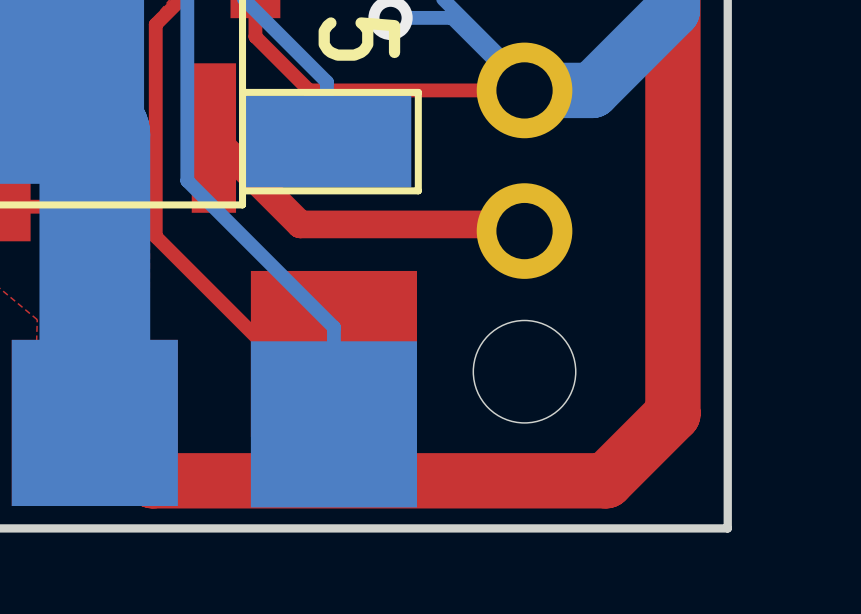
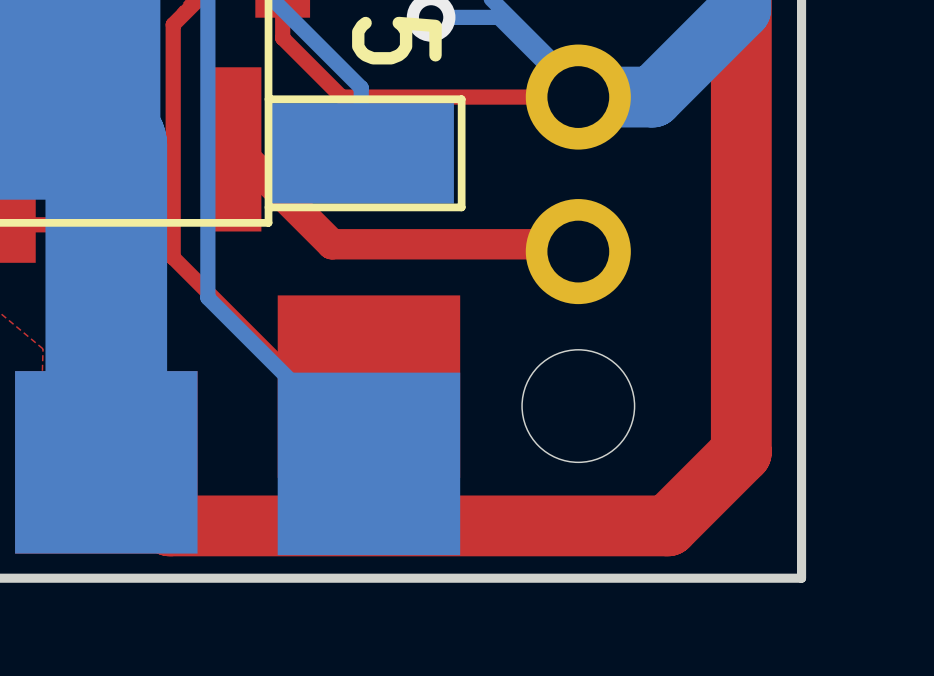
bottom track: (187, 180) (333, 327) (333, 419) -> (207, 196) (207, 297) (368, 458)

